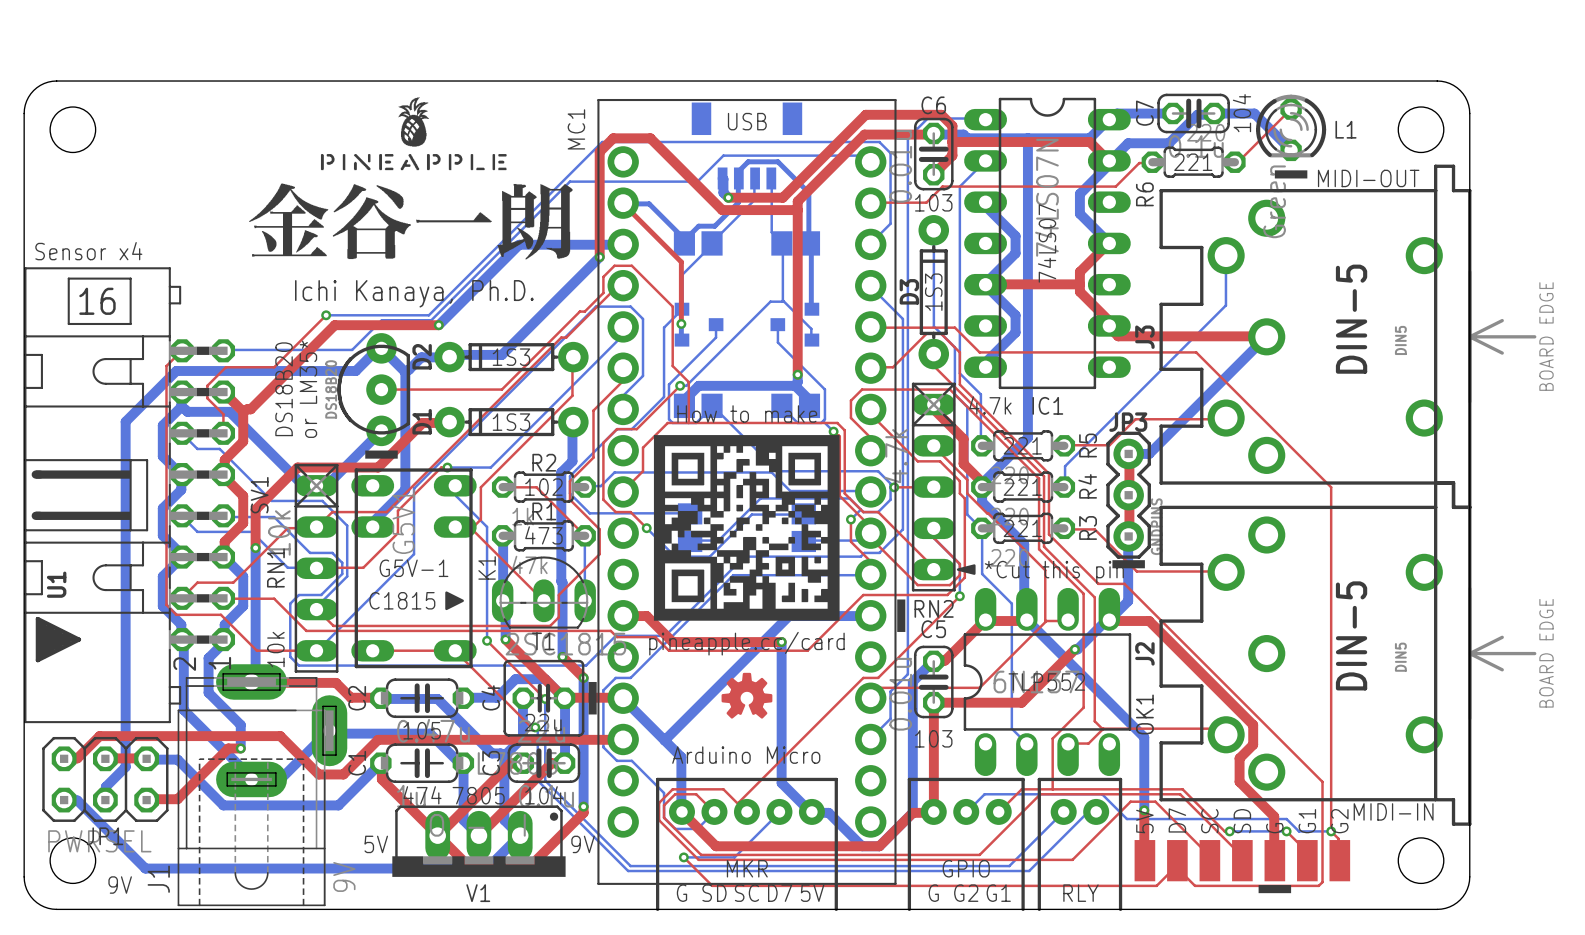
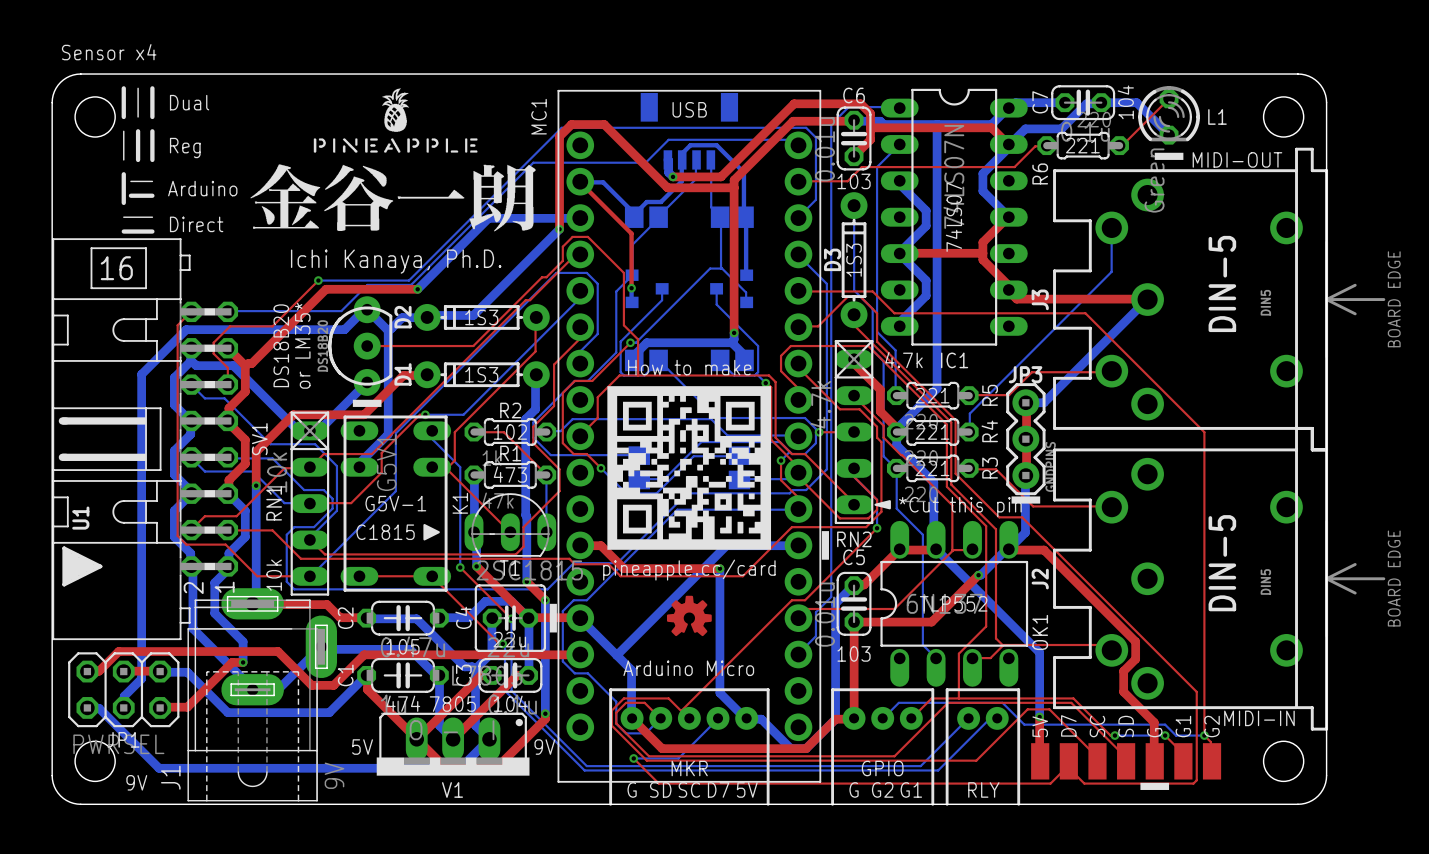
line: none -> (123, 88) (123, 116)
line: none -> (138, 88) (138, 116)
line: none -> (152, 88) (152, 116)
text: none -> Dual (189, 102)
line: none -> (123, 131) (123, 159)
line: none -> (138, 131) (138, 159)
line: none -> (152, 131) (152, 159)
text: none -> Reg (185, 148)
line: none -> (123, 174) (123, 202)
line: none -> (130, 181) (152, 181)
text: none -> Arduino (202, 188)
line: none -> (130, 195) (152, 195)
line: none -> (123, 217) (152, 217)
text position: Sensor x4 (88, 251) -> Sensor x4 (109, 52)
text: none -> Direct (196, 224)
line: none -> (123, 231) (152, 231)

